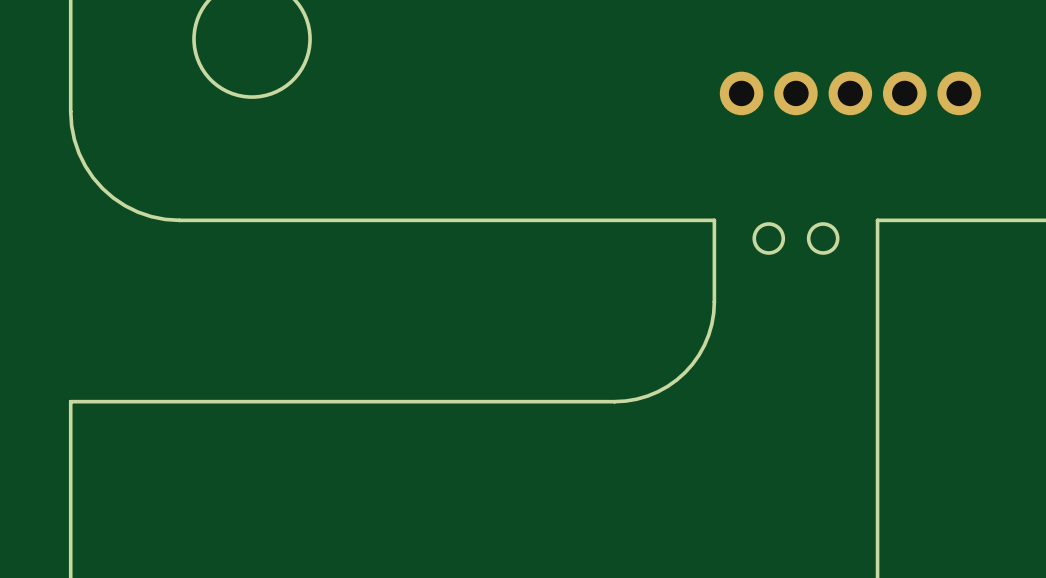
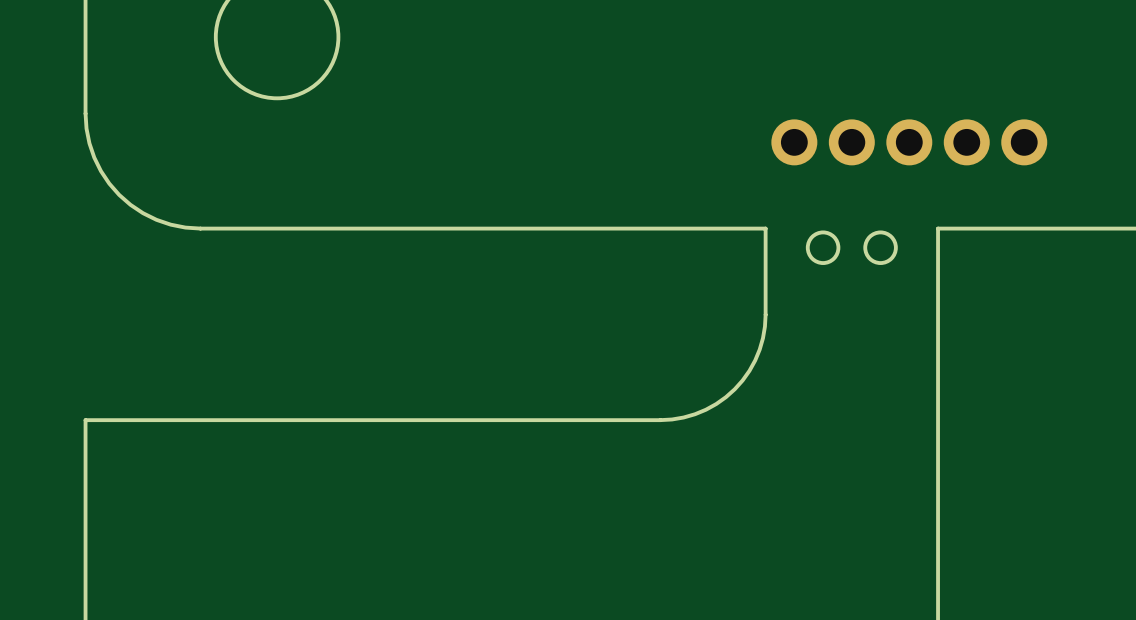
part position: (850, 93) -> (909, 142)

